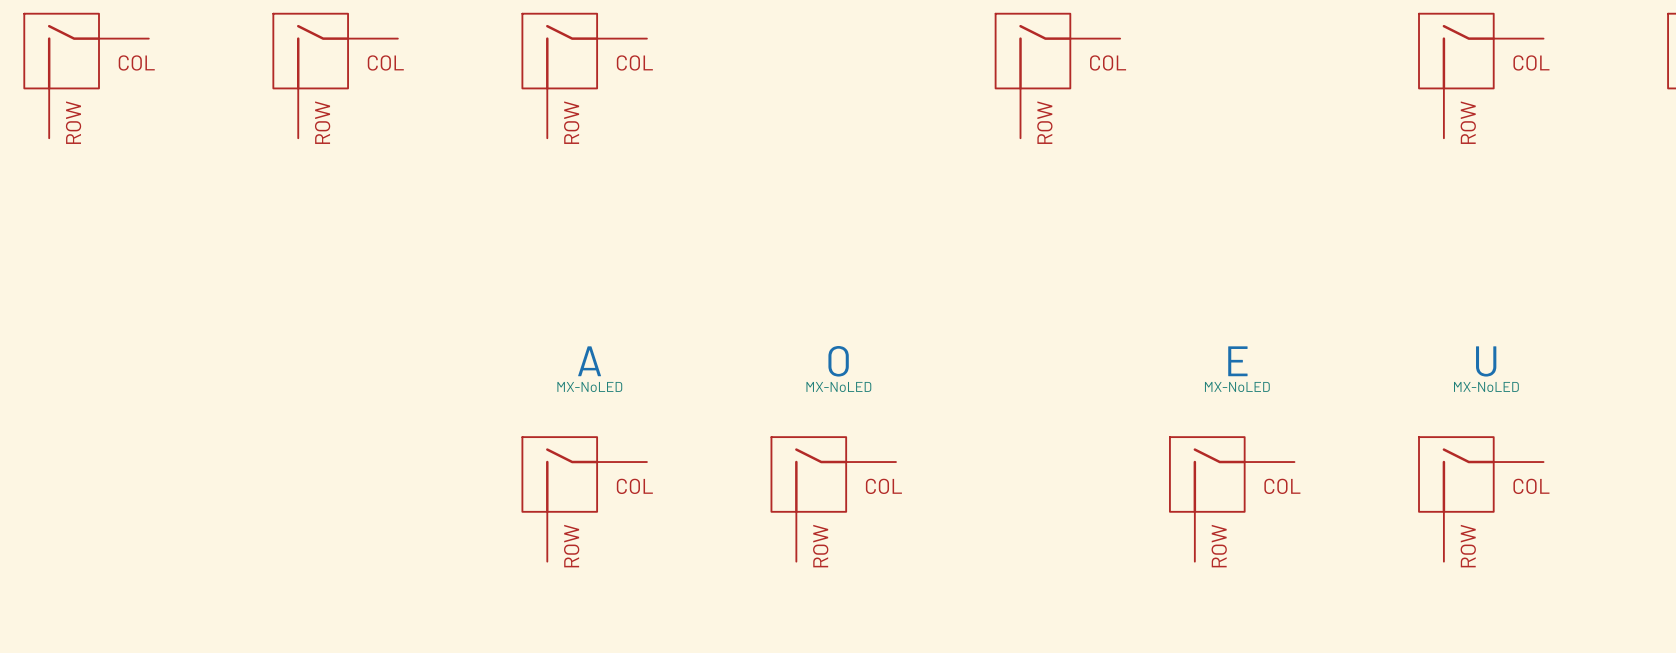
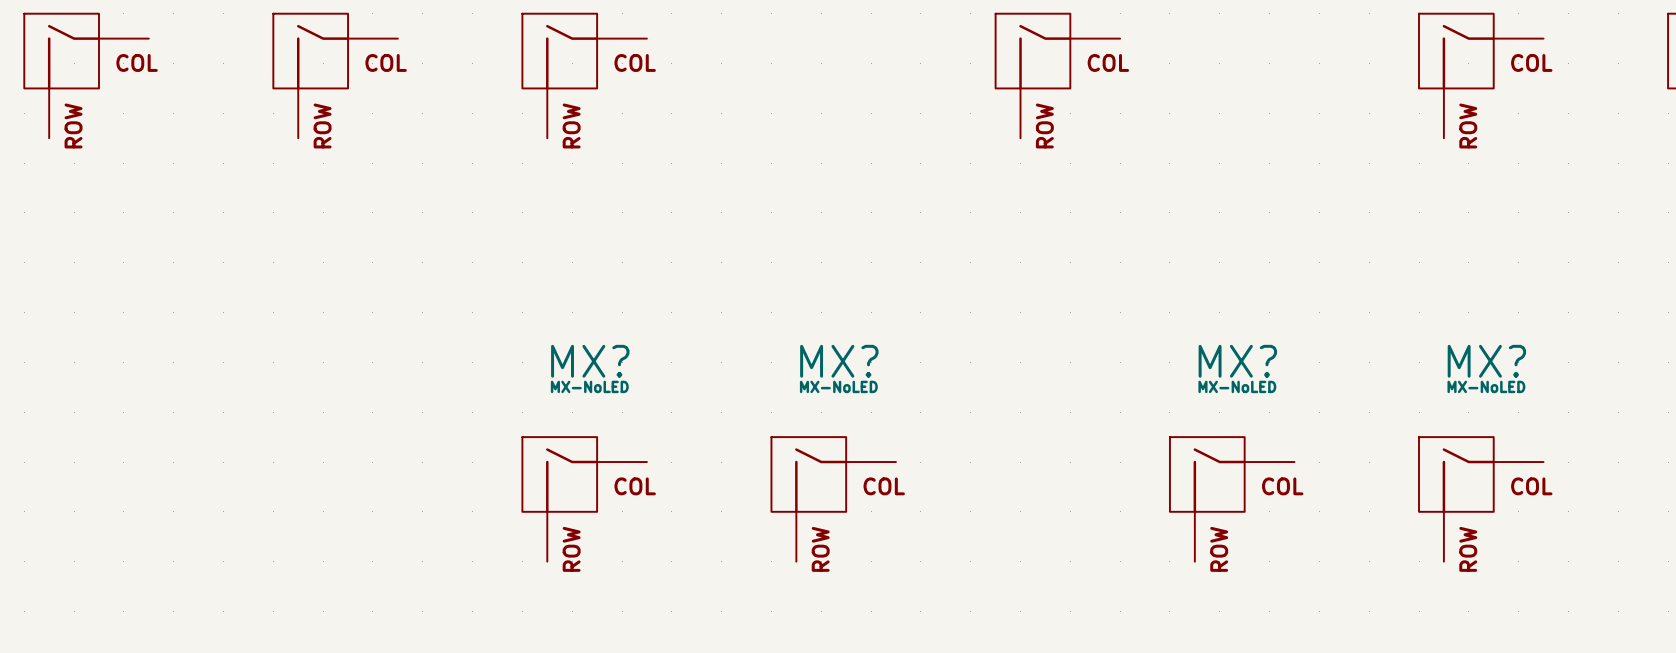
A name: A (589, 361) -> MX? (590, 361)
O name: O (838, 361) -> MX? (839, 361)
E name: E (1237, 361) -> MX? (1237, 361)
U name: U (1486, 361) -> MX? (1486, 361)

